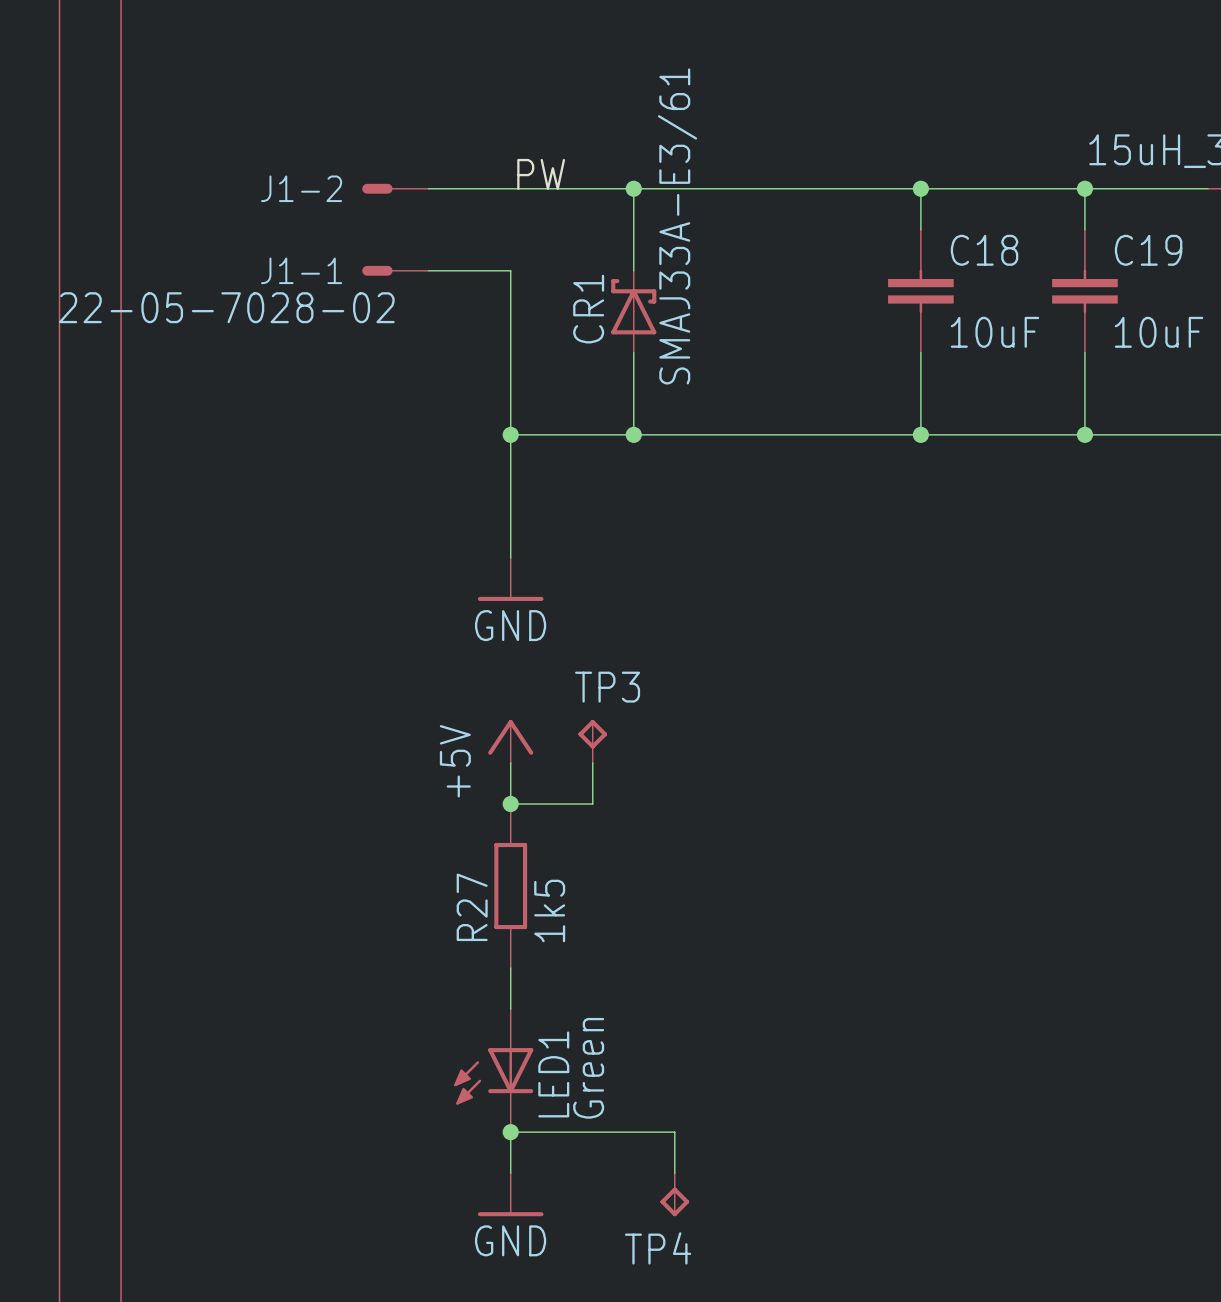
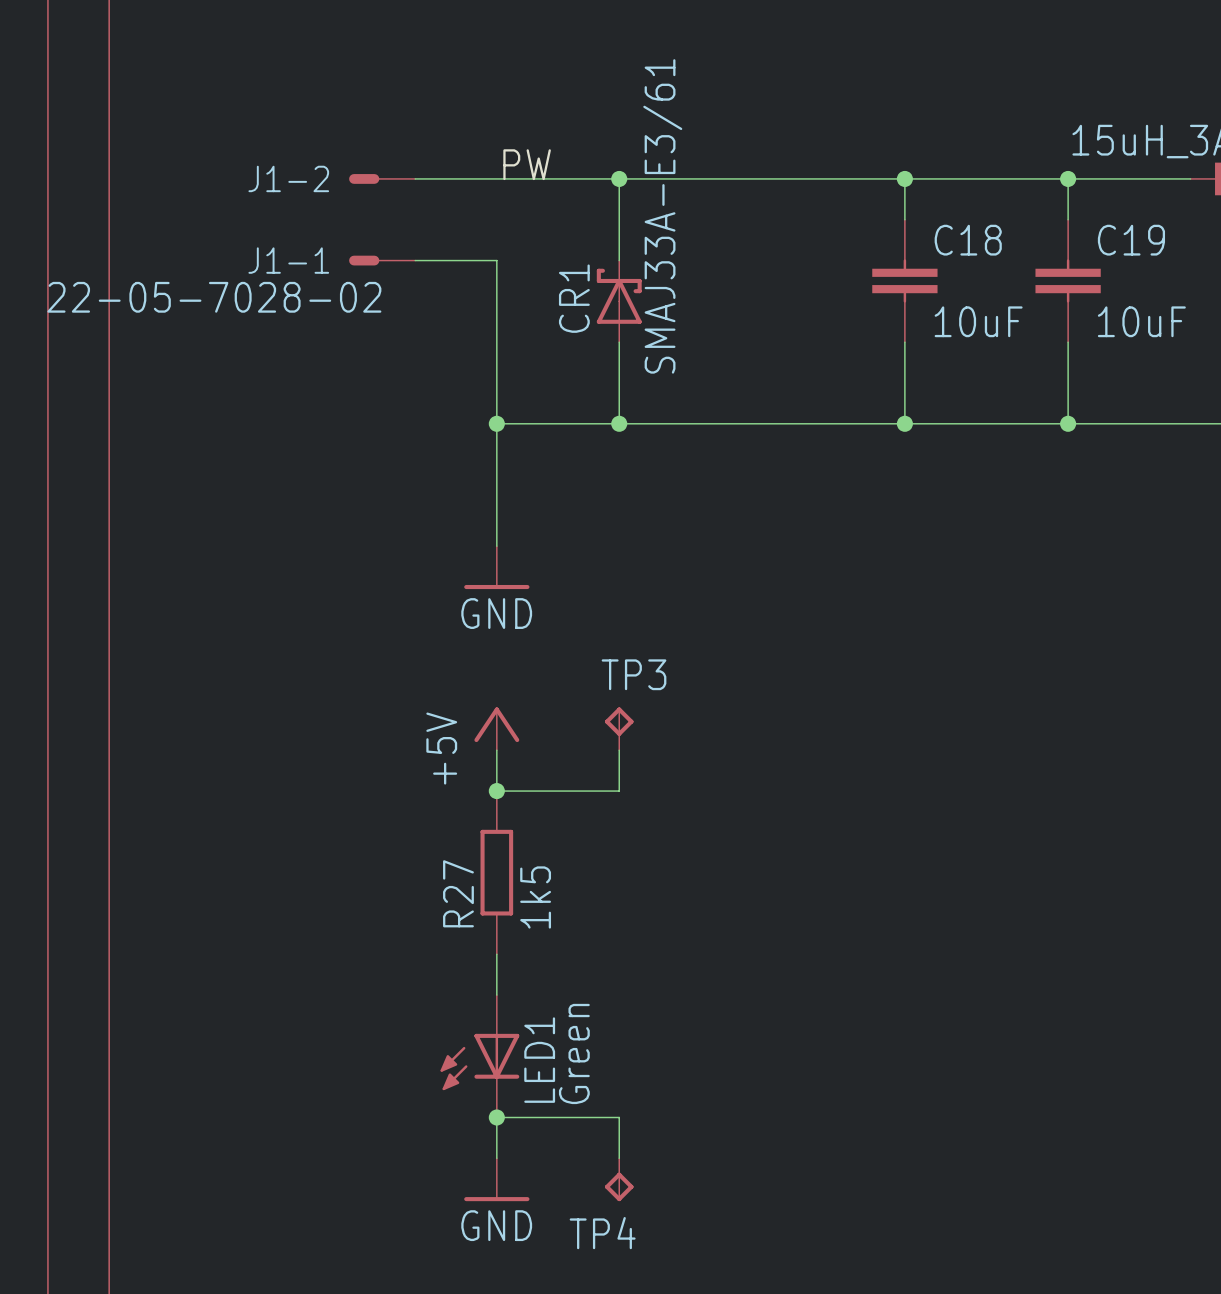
TP3 position: (592, 741) -> (619, 728)
wire: (592, 762) (592, 804) -> (619, 750) (619, 791) (578, 791)
wire: (633, 1132) (674, 1132) (674, 1173) -> (619, 1117) (619, 1158)
TP4 position: (674, 1194) -> (619, 1179)

